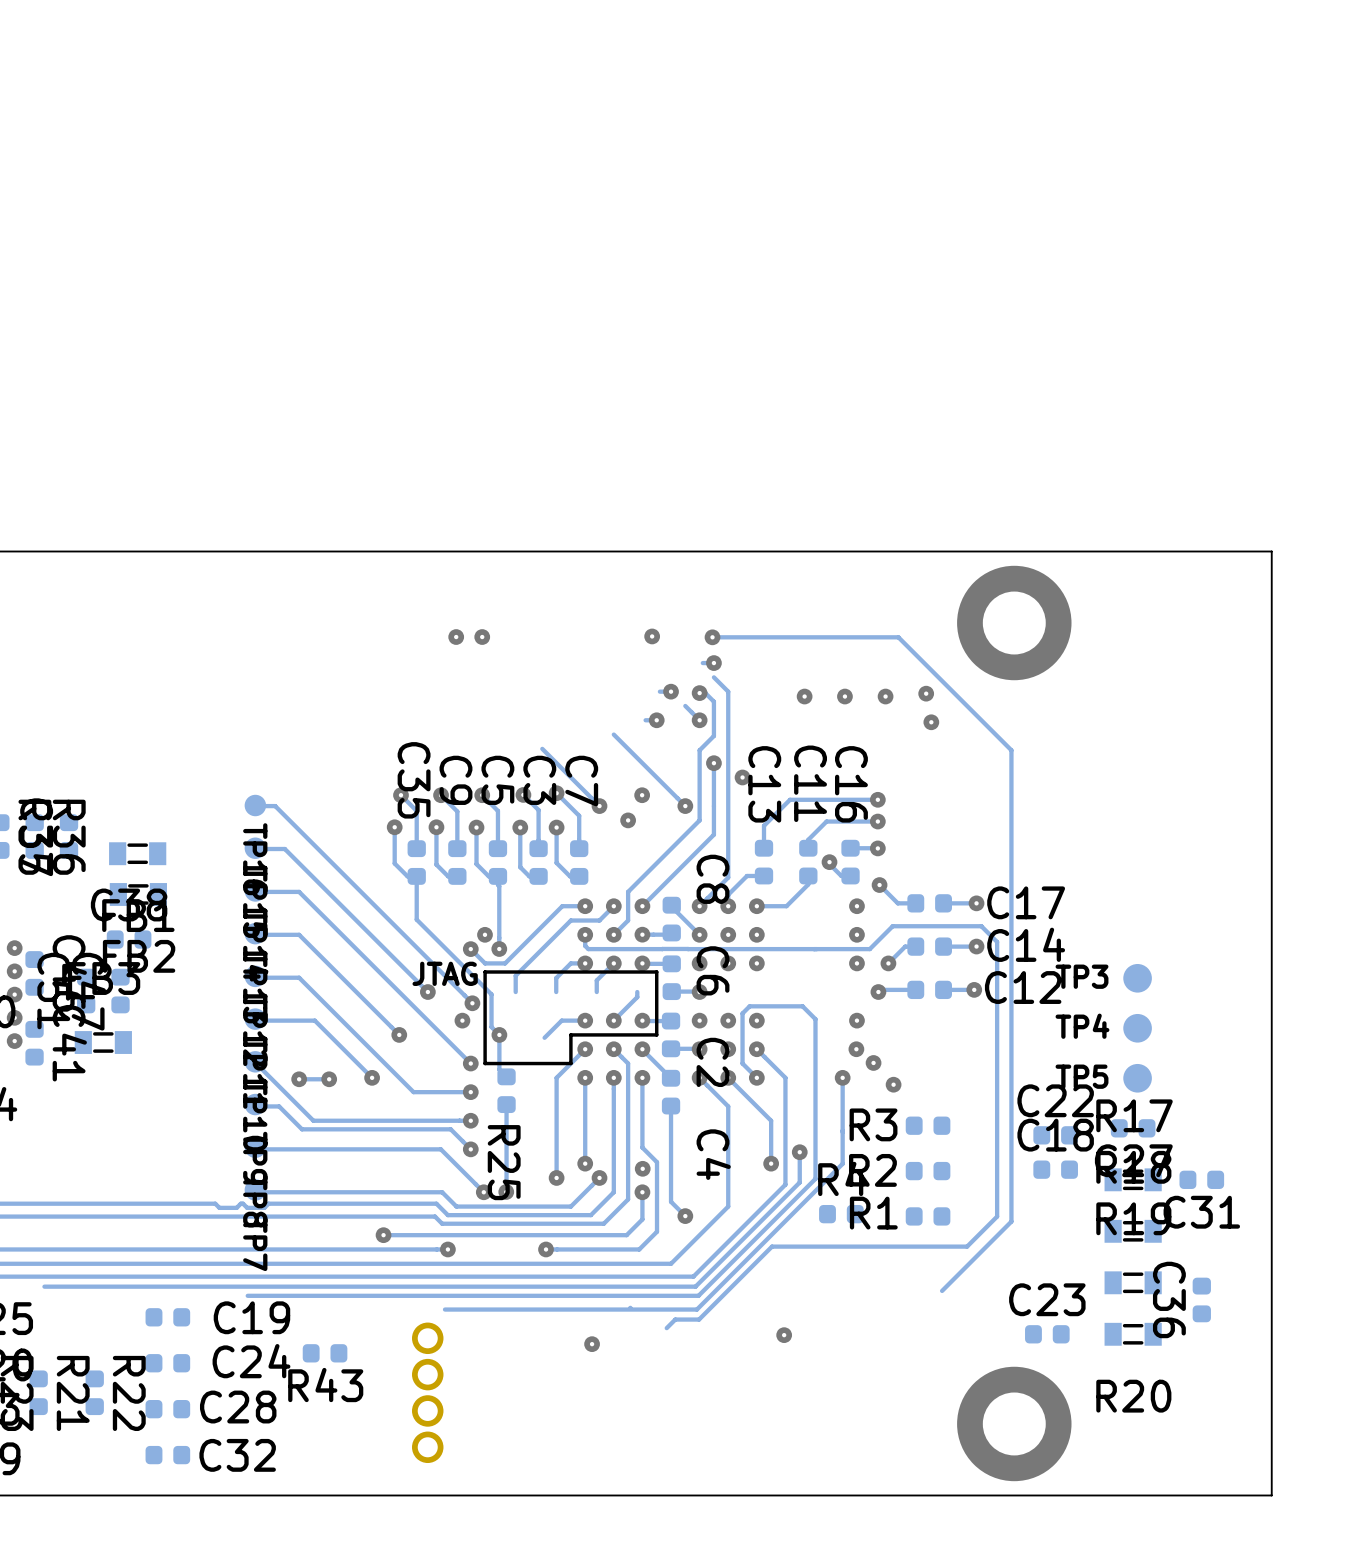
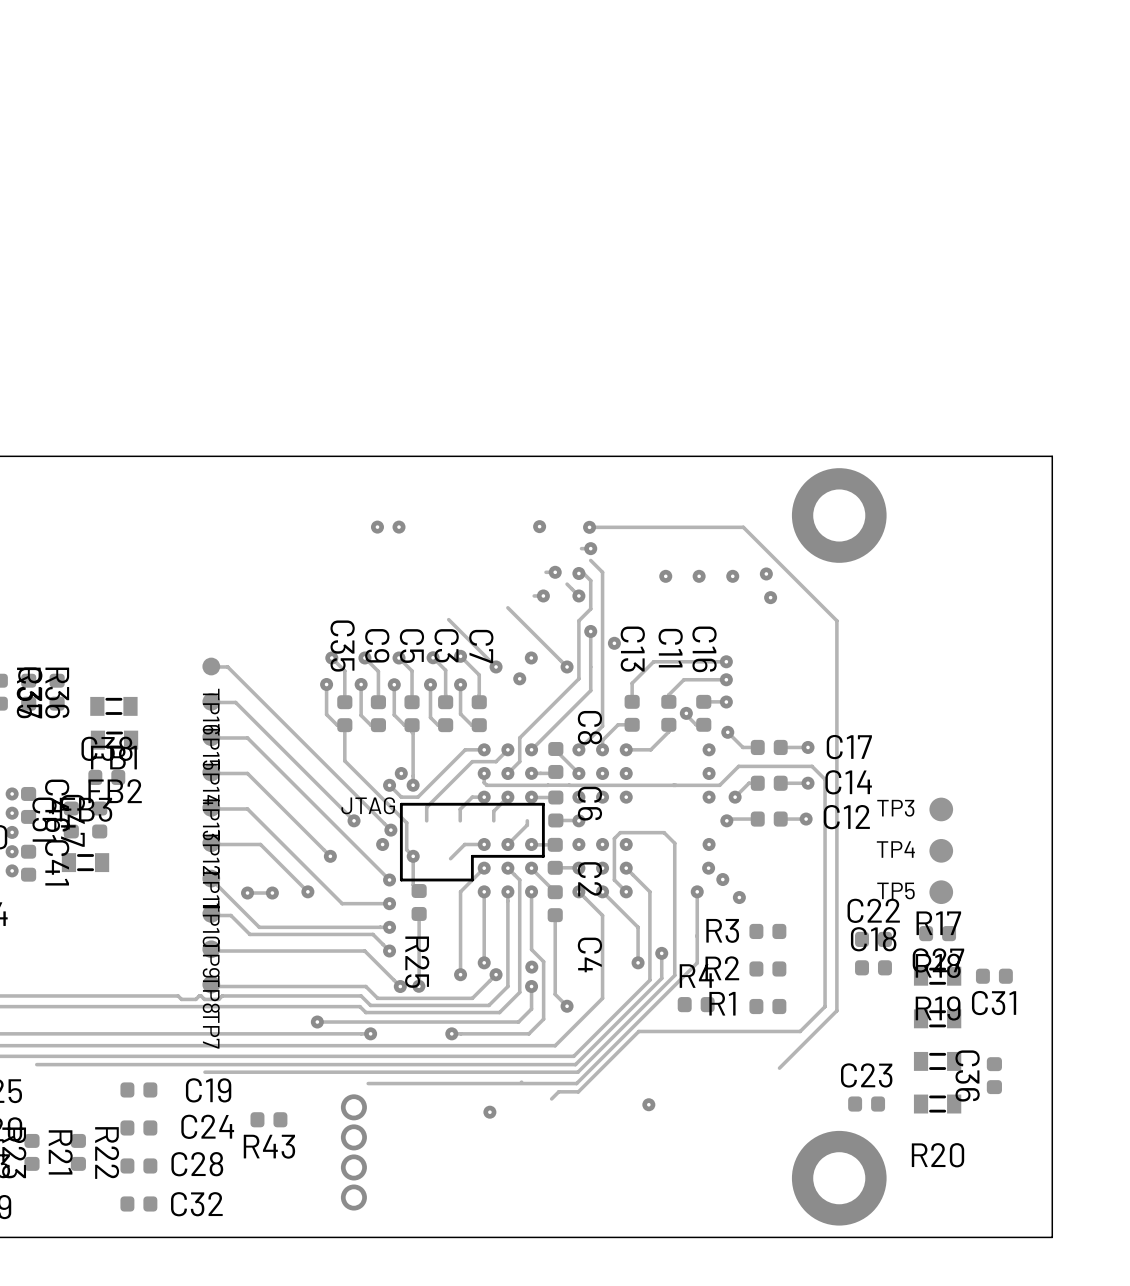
via: (14, 948) -> none
via: none -> (12, 793)
via: (14, 971) -> none
via: none -> (12, 813)
via: (14, 994) -> none
via: none -> (12, 832)
via: (14, 1017) -> none
via: none -> (12, 851)
via: (14, 1041) -> none
via: none -> (12, 870)

